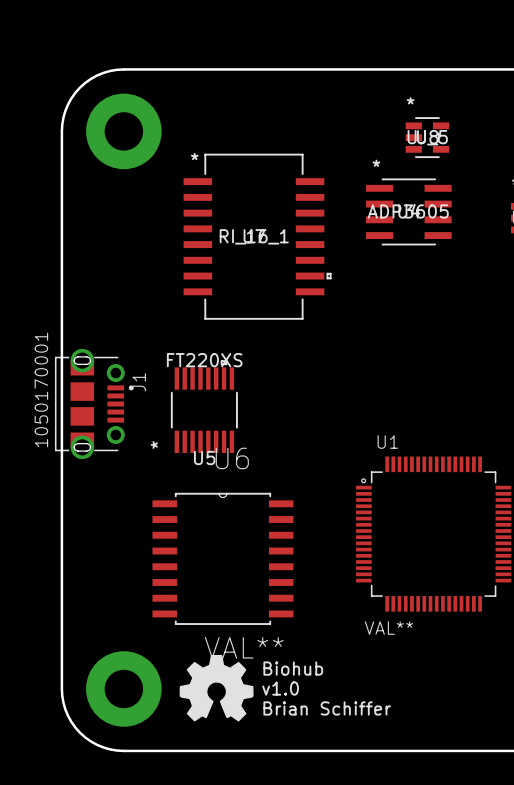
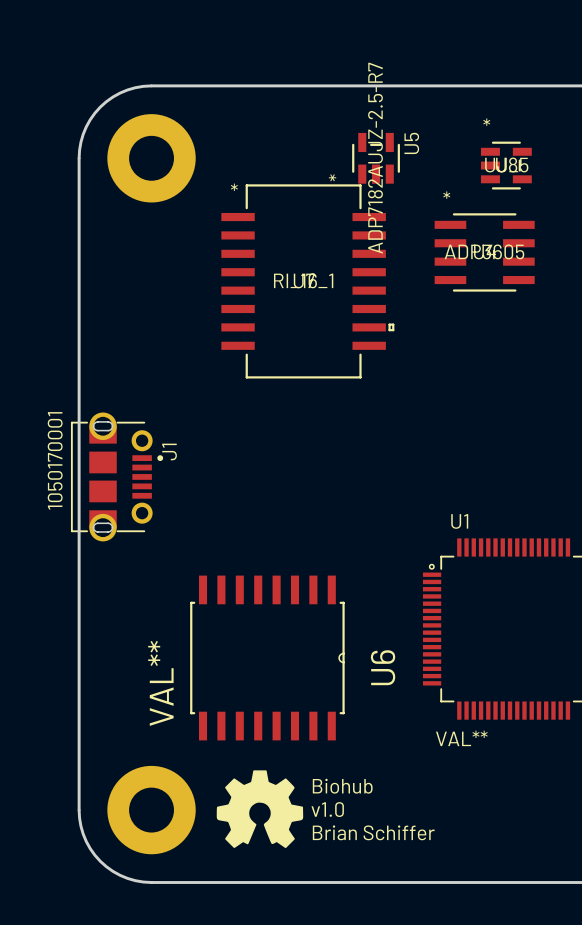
U5 footprint: [170, 360, 238, 453] -> [352, 132, 400, 184]
U5 value: FT220XS (204, 360) -> ADP7182AUJZ-2.5-R7 (375, 158)
U5 name position: U5 (204, 457) -> U5 (411, 143)
U6 rotation: 0° (222, 558) -> 90° clockwise (267, 658)

